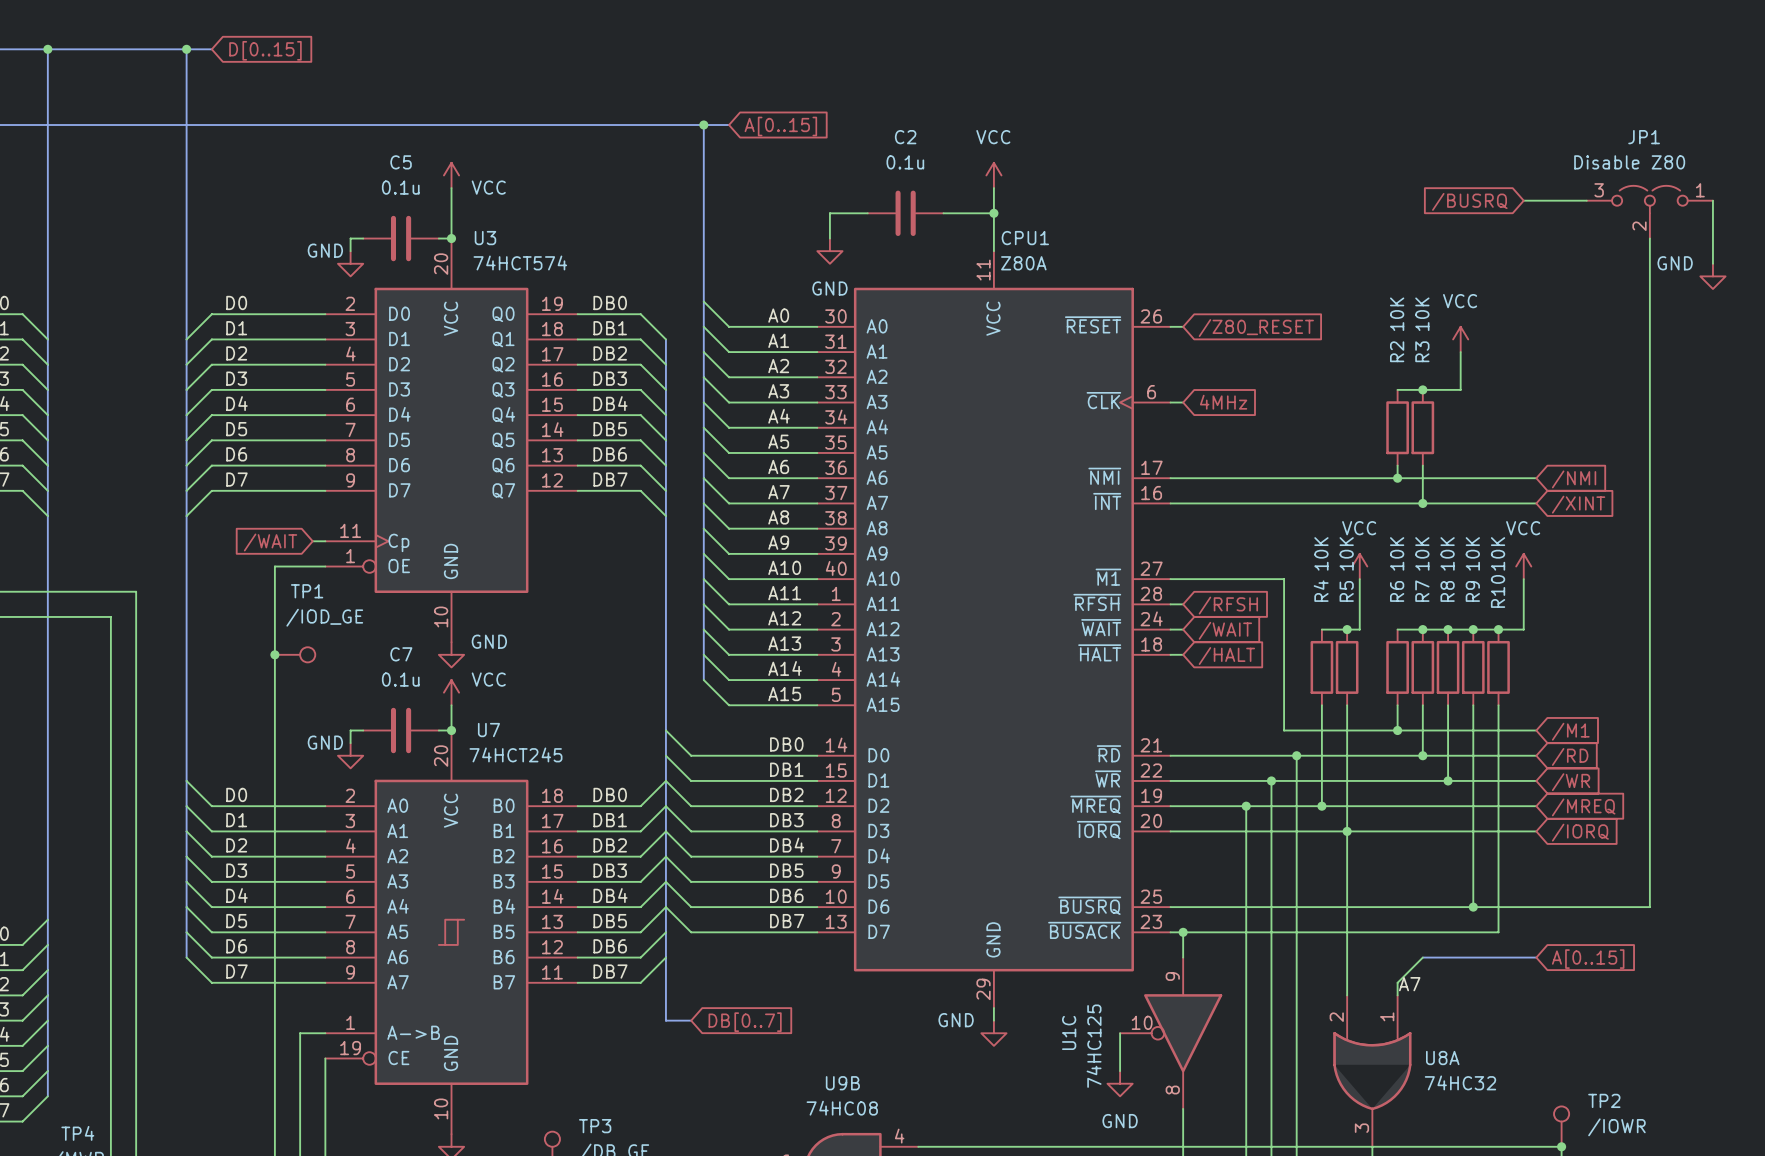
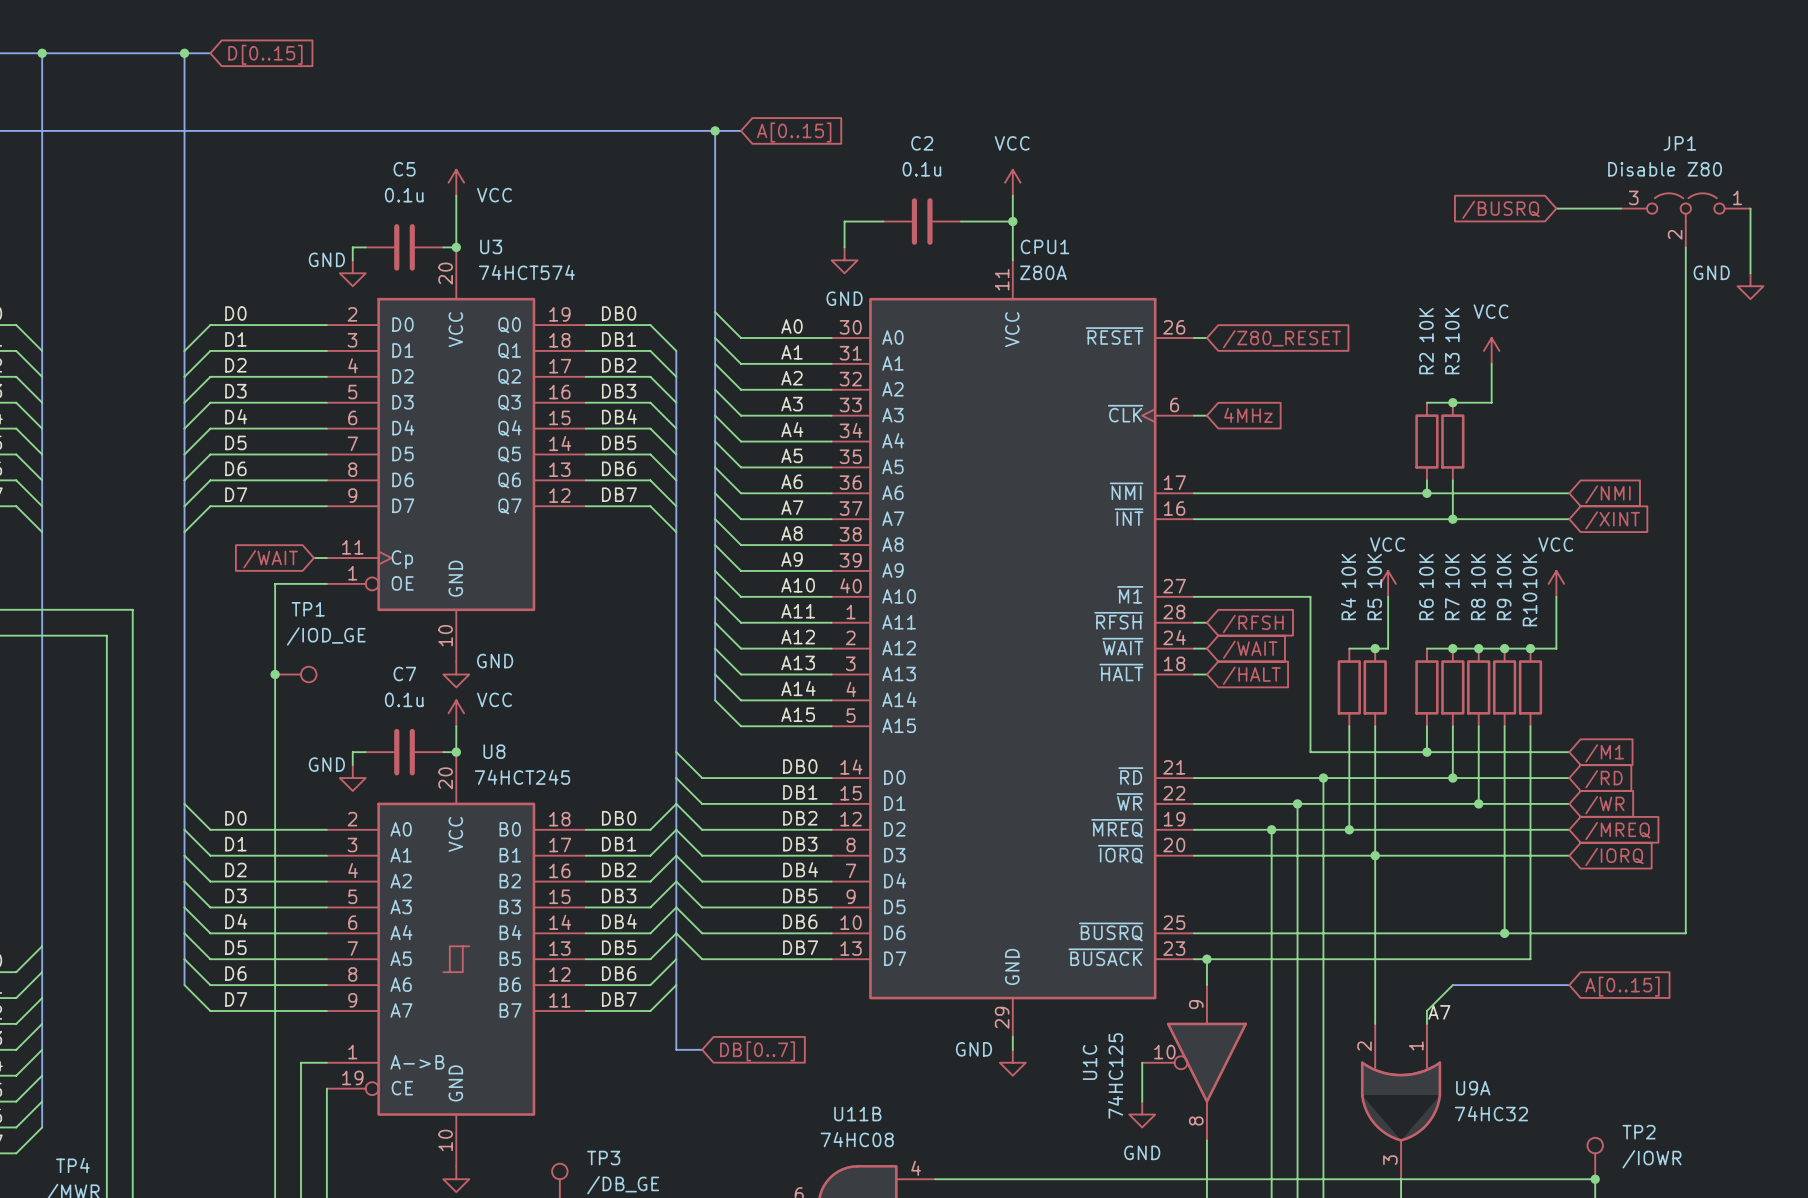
U7 name: U7 (488, 730) -> U8 (494, 751)
U8A name: U8A (1442, 1058) -> U9A (1473, 1088)
U9B name: U9B (842, 1083) -> U11B (857, 1114)

